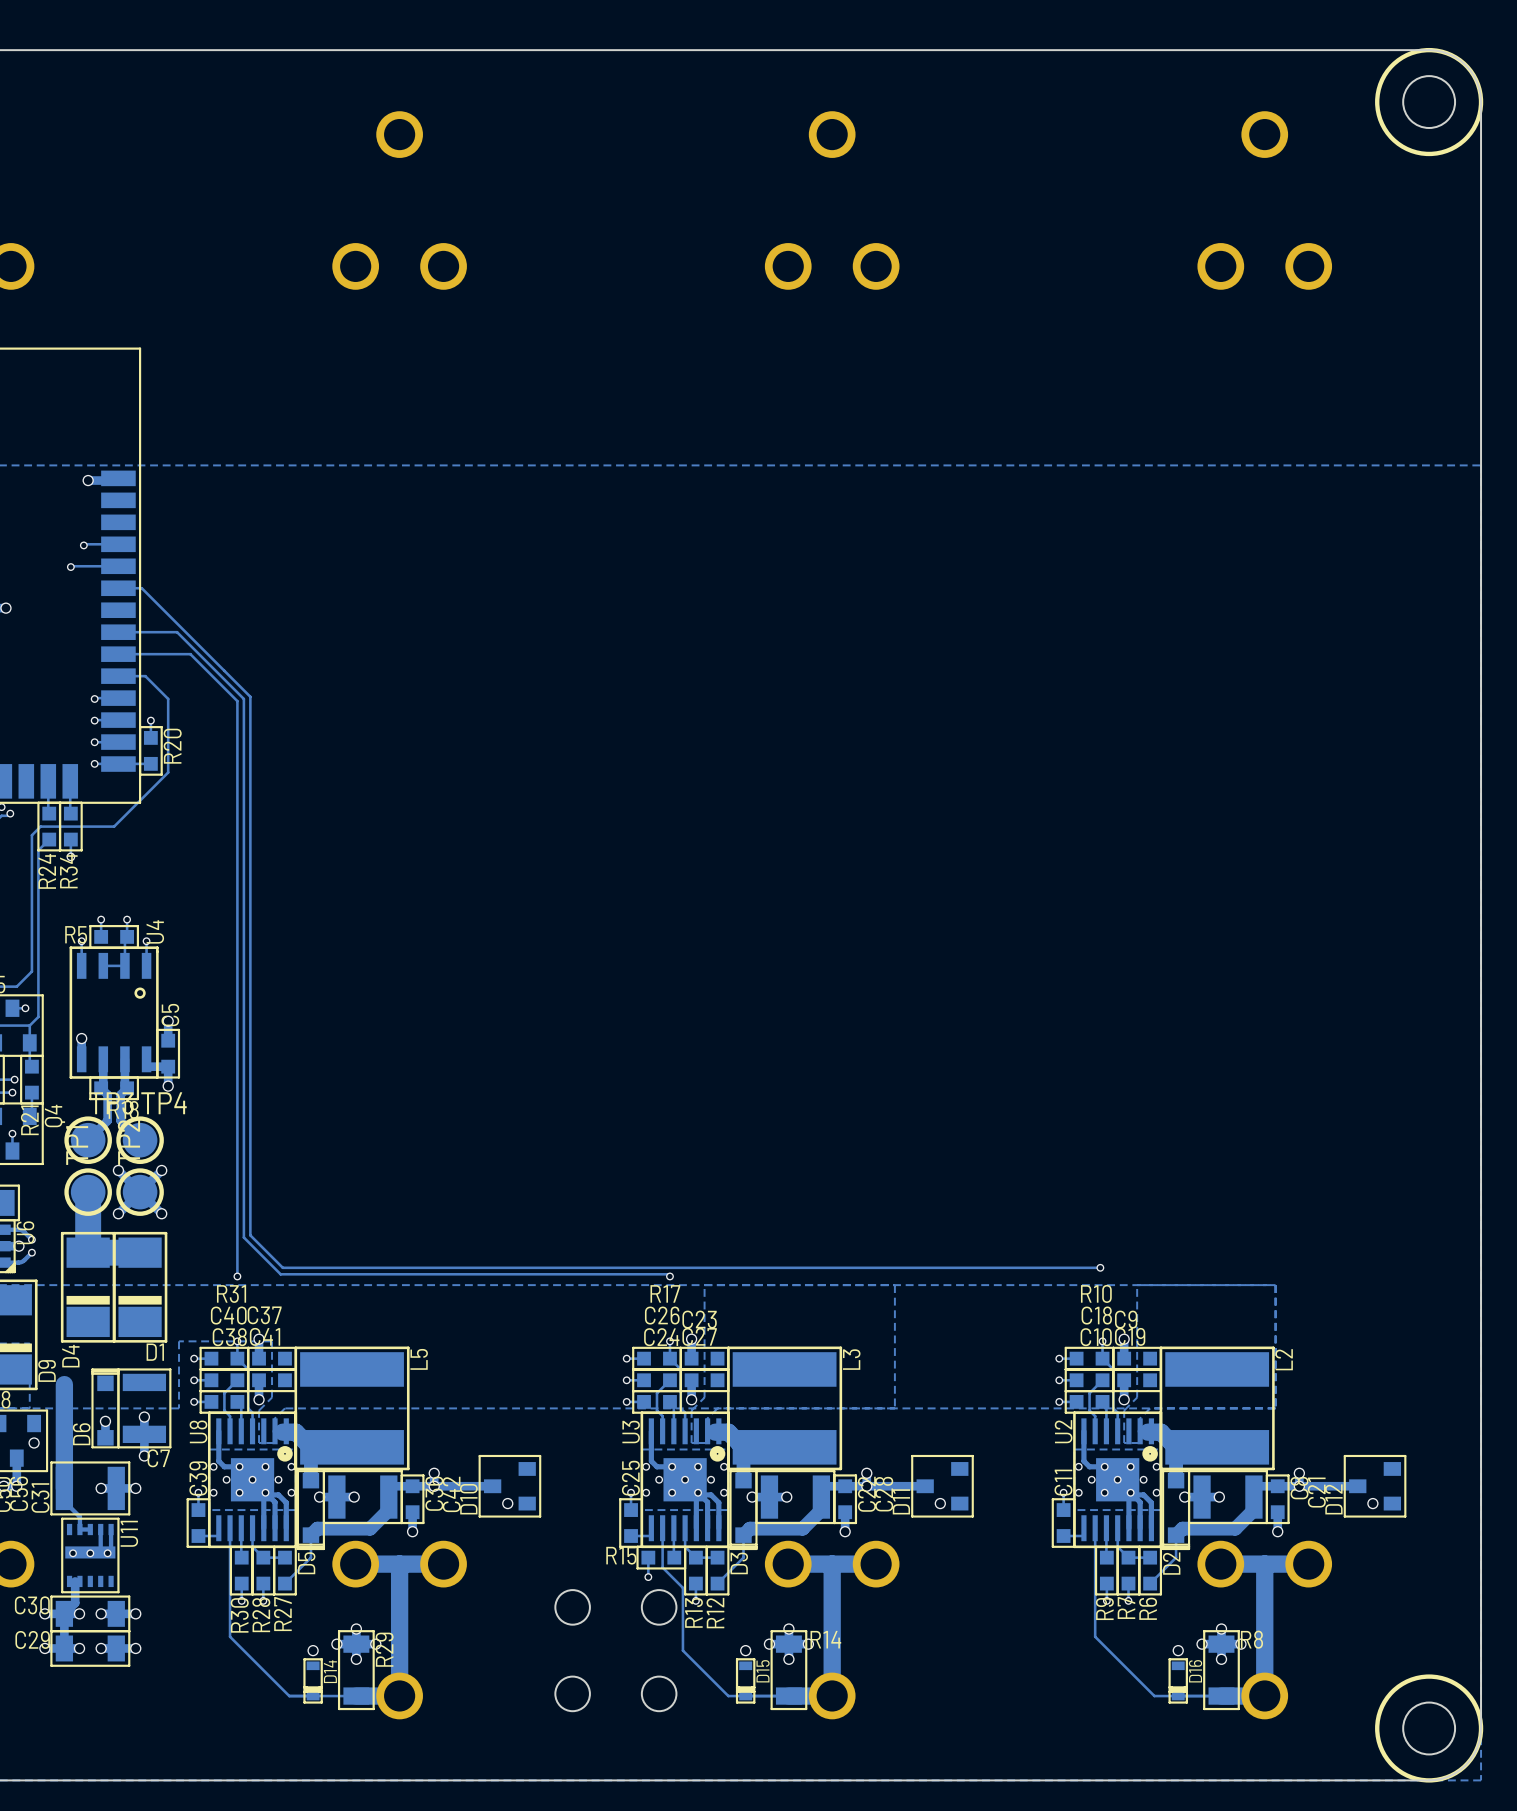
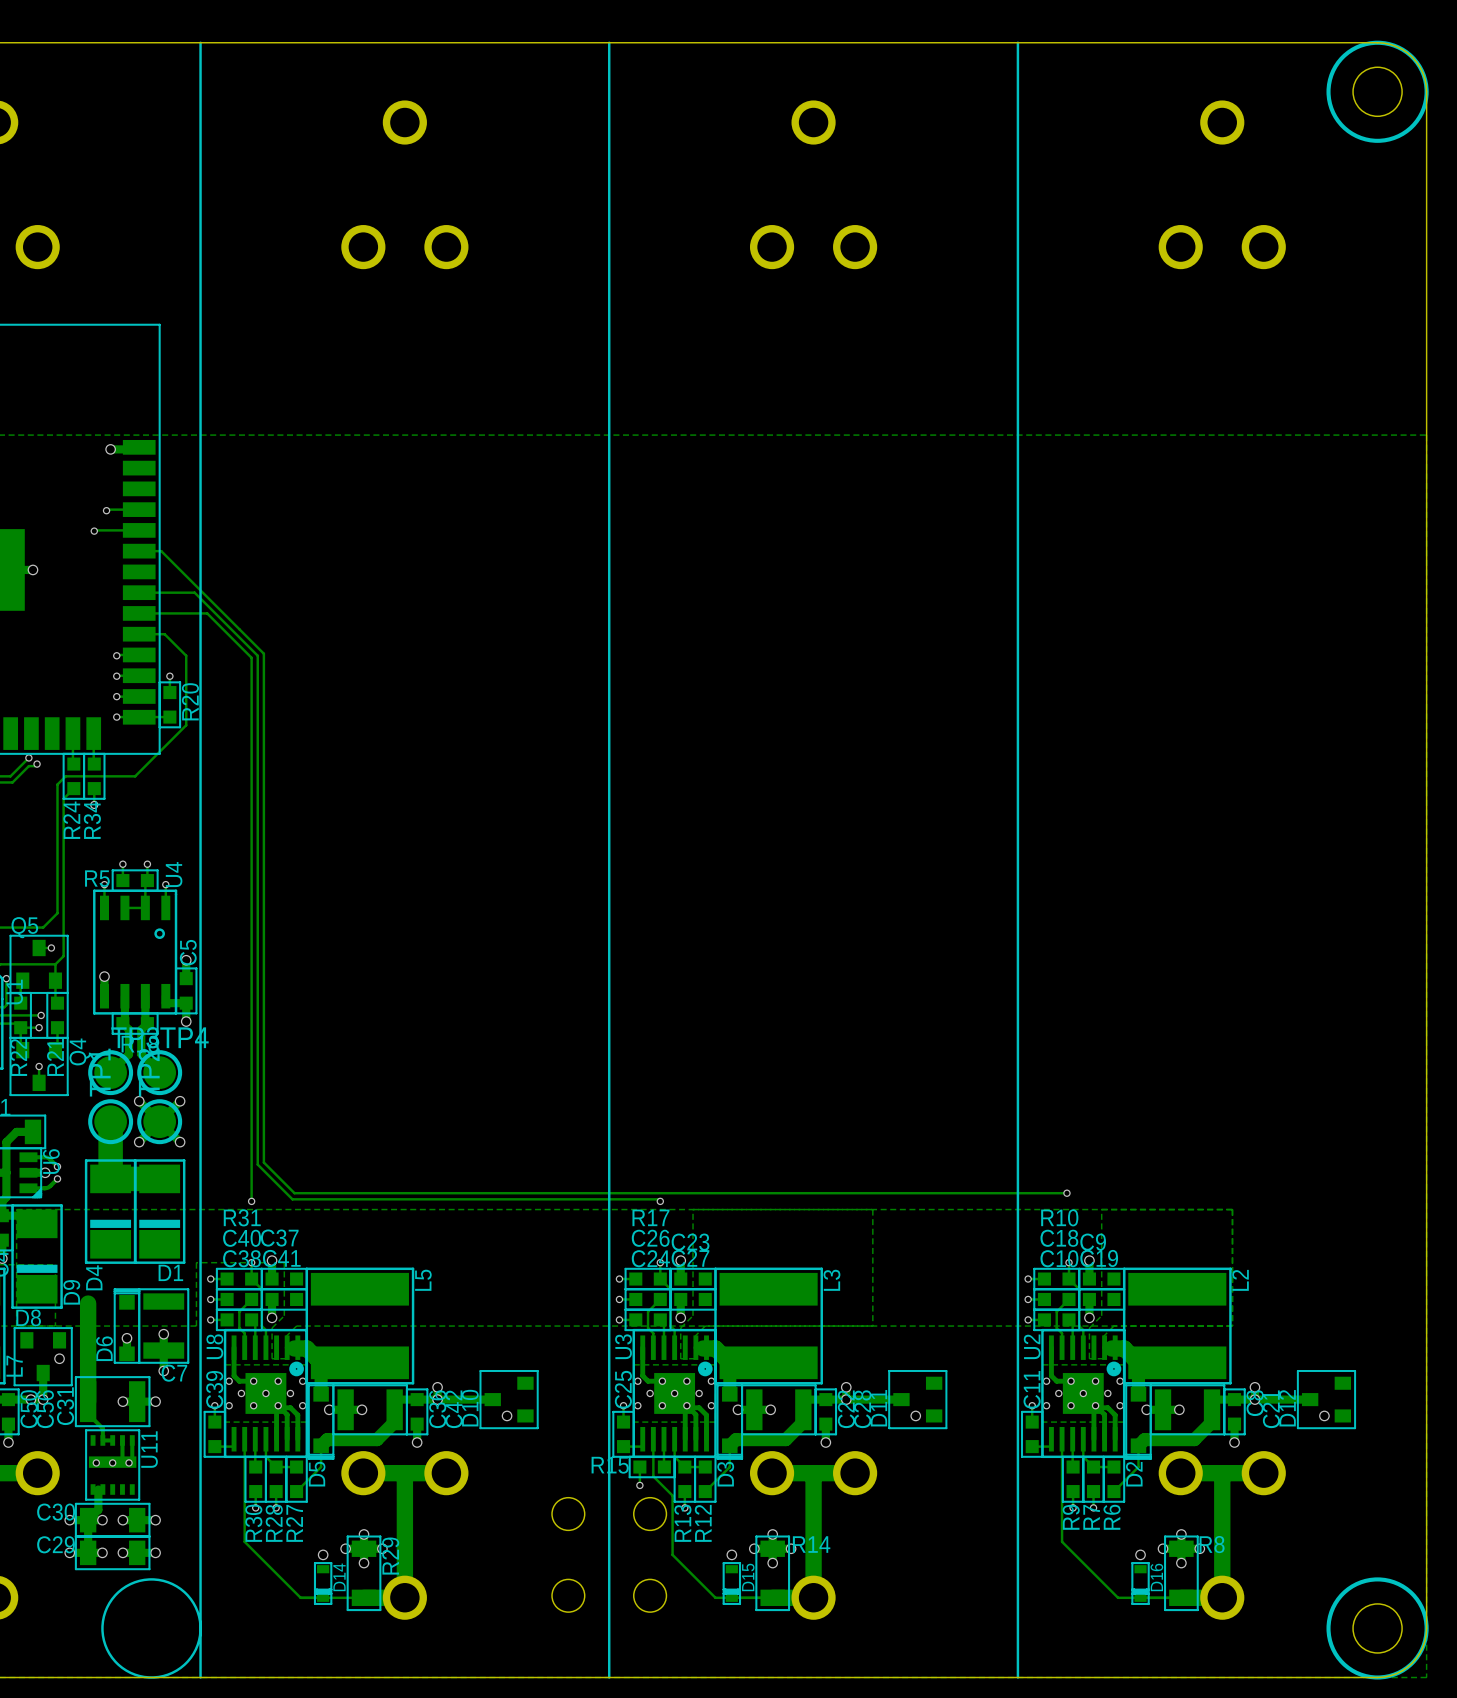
line: none -> (200, 42) (200, 1677)
line: none -> (609, 42) (609, 1677)
line: none -> (1017, 42) (1017, 1677)
drawing: none -> [101, 1578, 202, 1679]

